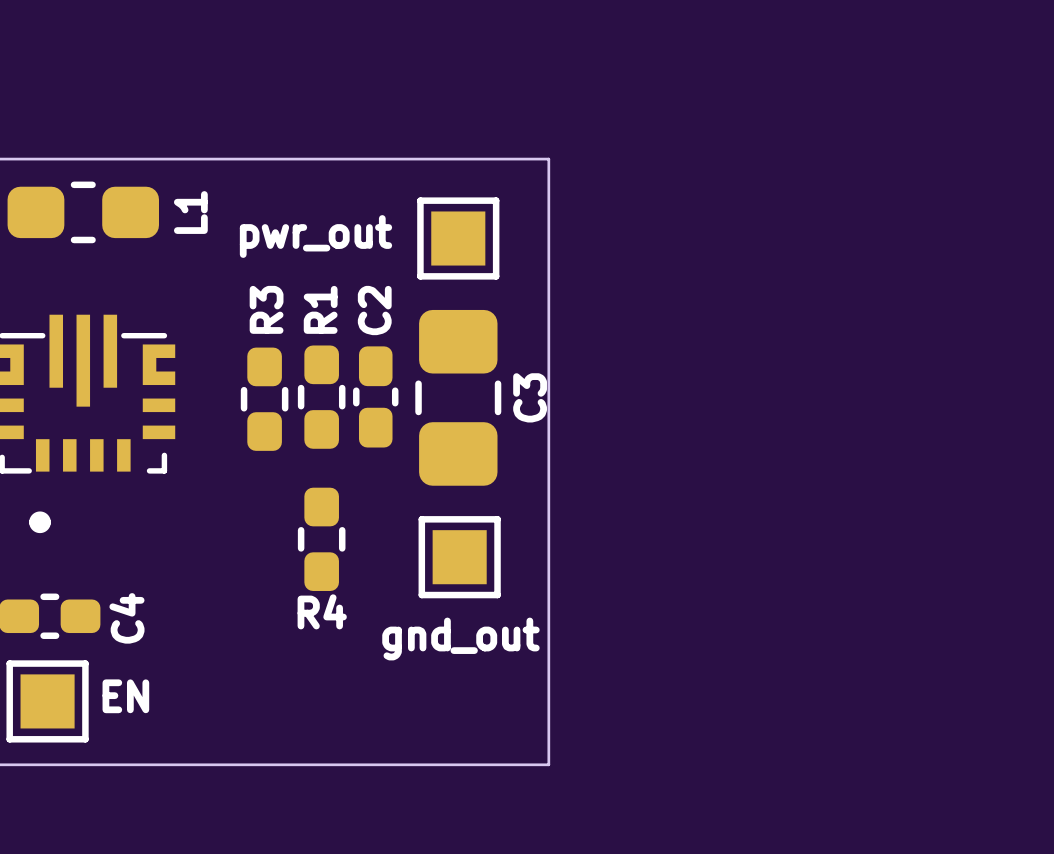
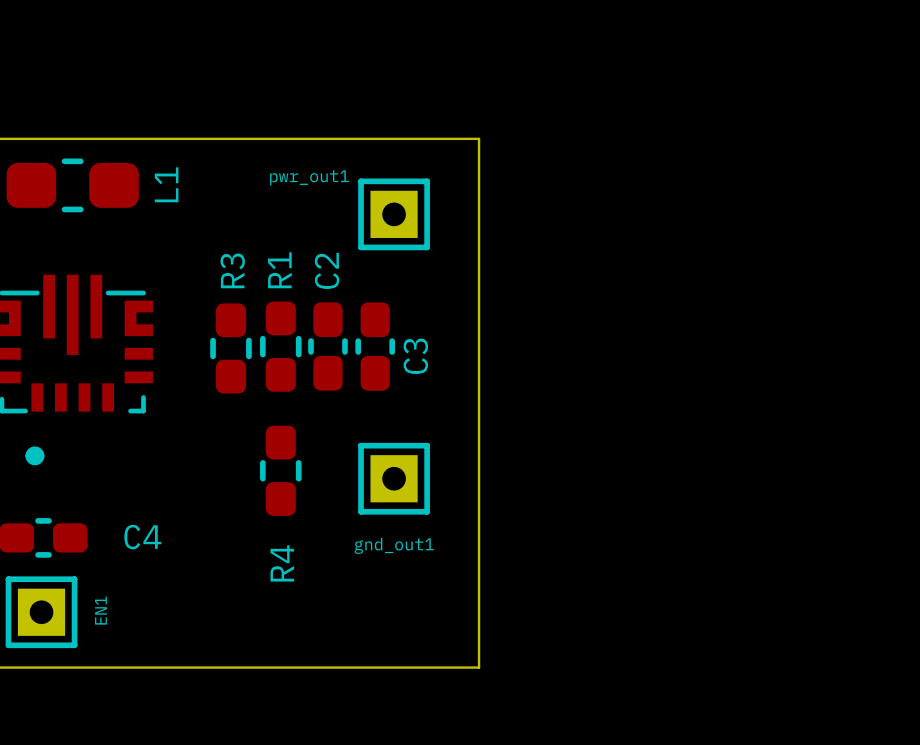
pwr_out: (458, 238) -> none
pwr_out1: none -> (394, 214)
C3 footprint: [415, 309, 502, 486] -> [355, 302, 396, 391]
gnd_out1: none -> (394, 478)
gnd_out: (459, 557) -> none
R4 name rotation: 0° (322, 611) -> 90° counterclockwise (282, 563)
C4 name rotation: 0° (126, 618) -> 90° clockwise (142, 537)
EN: (47, 701) -> none
EN1: none -> (41, 612)

